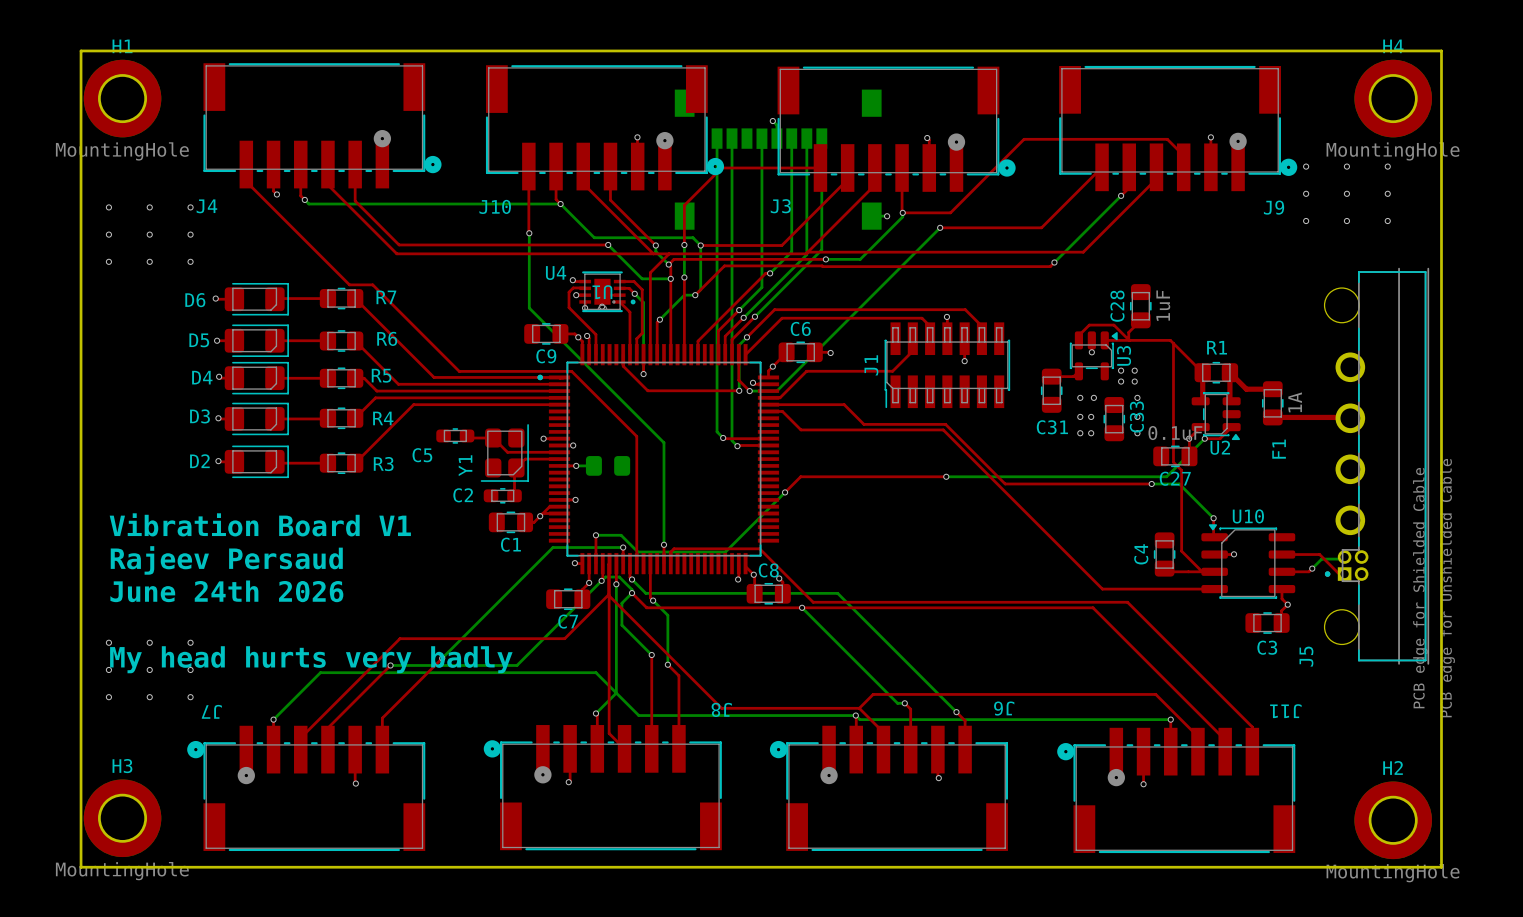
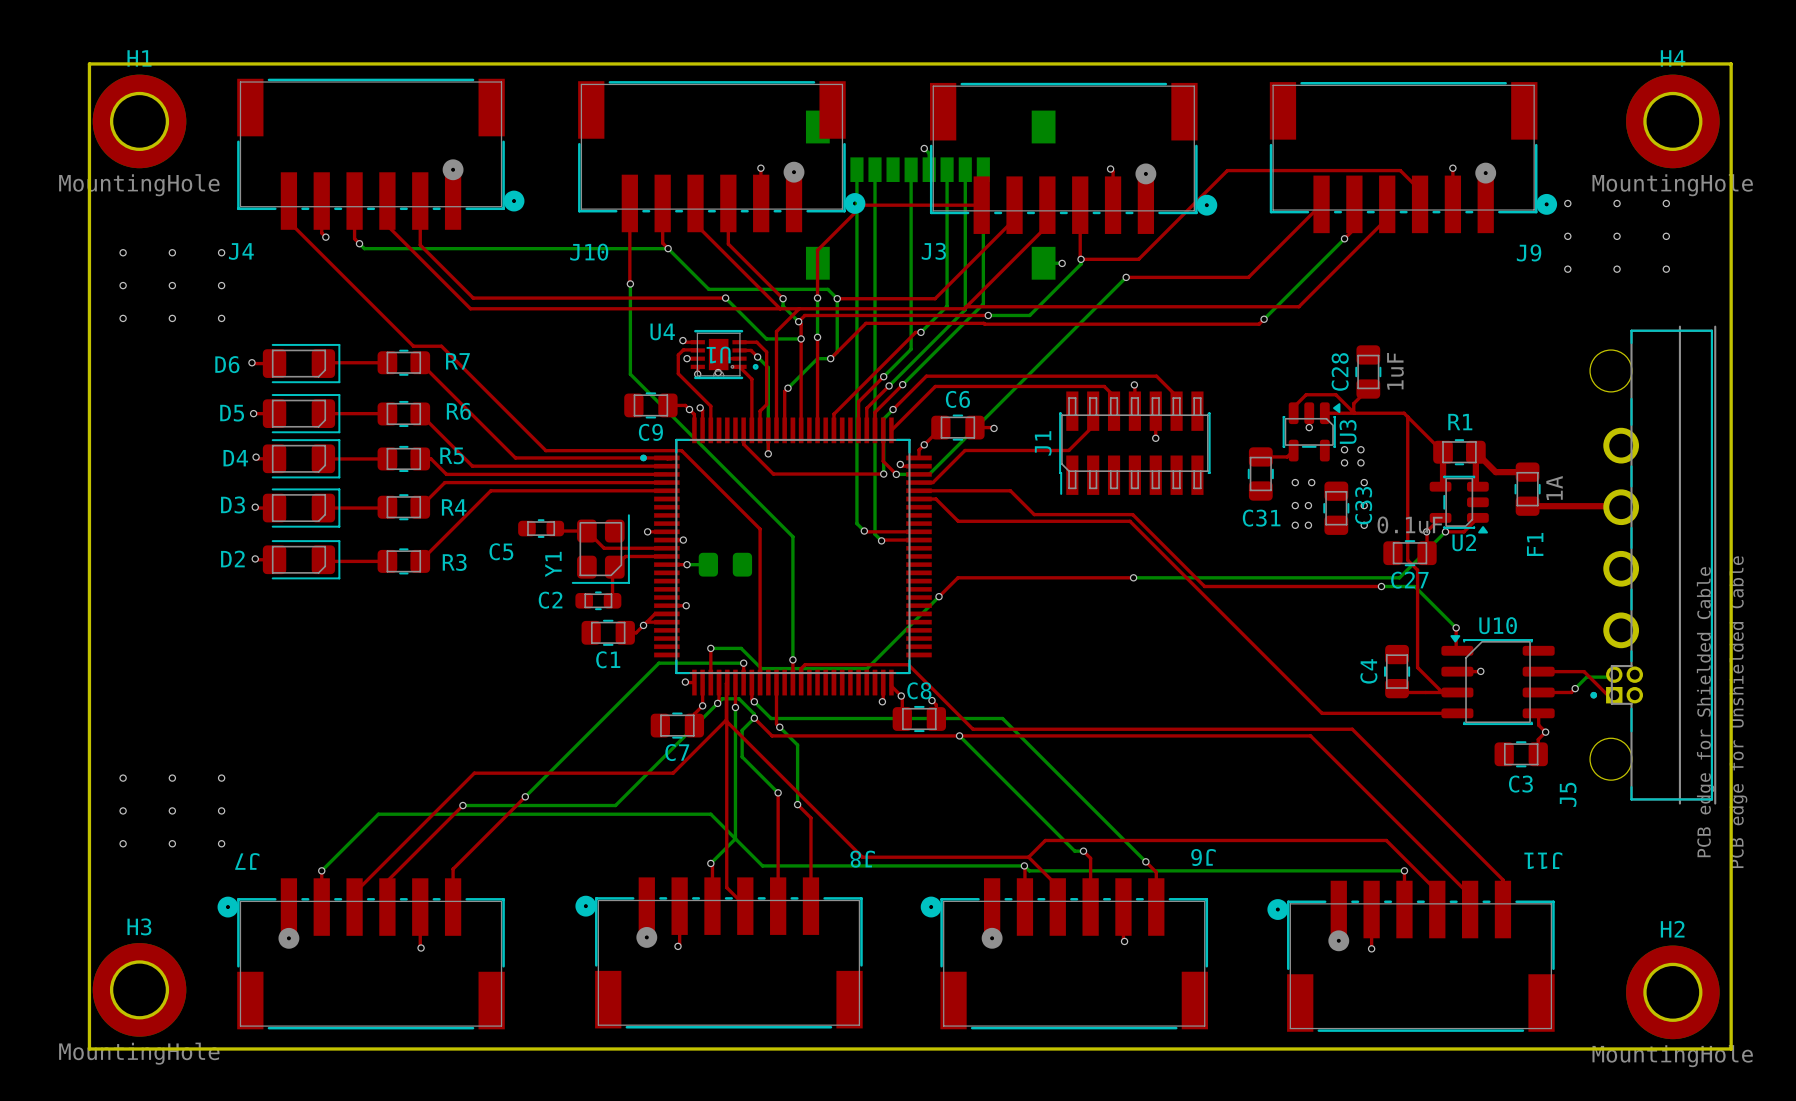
text: Vibration Board V1 (260, 524) -> none
text: Rajeev Persaud (226, 560) -> none
text: June 24th 2026 (226, 591) -> none
text: My head hurts very badly (311, 659) -> none

